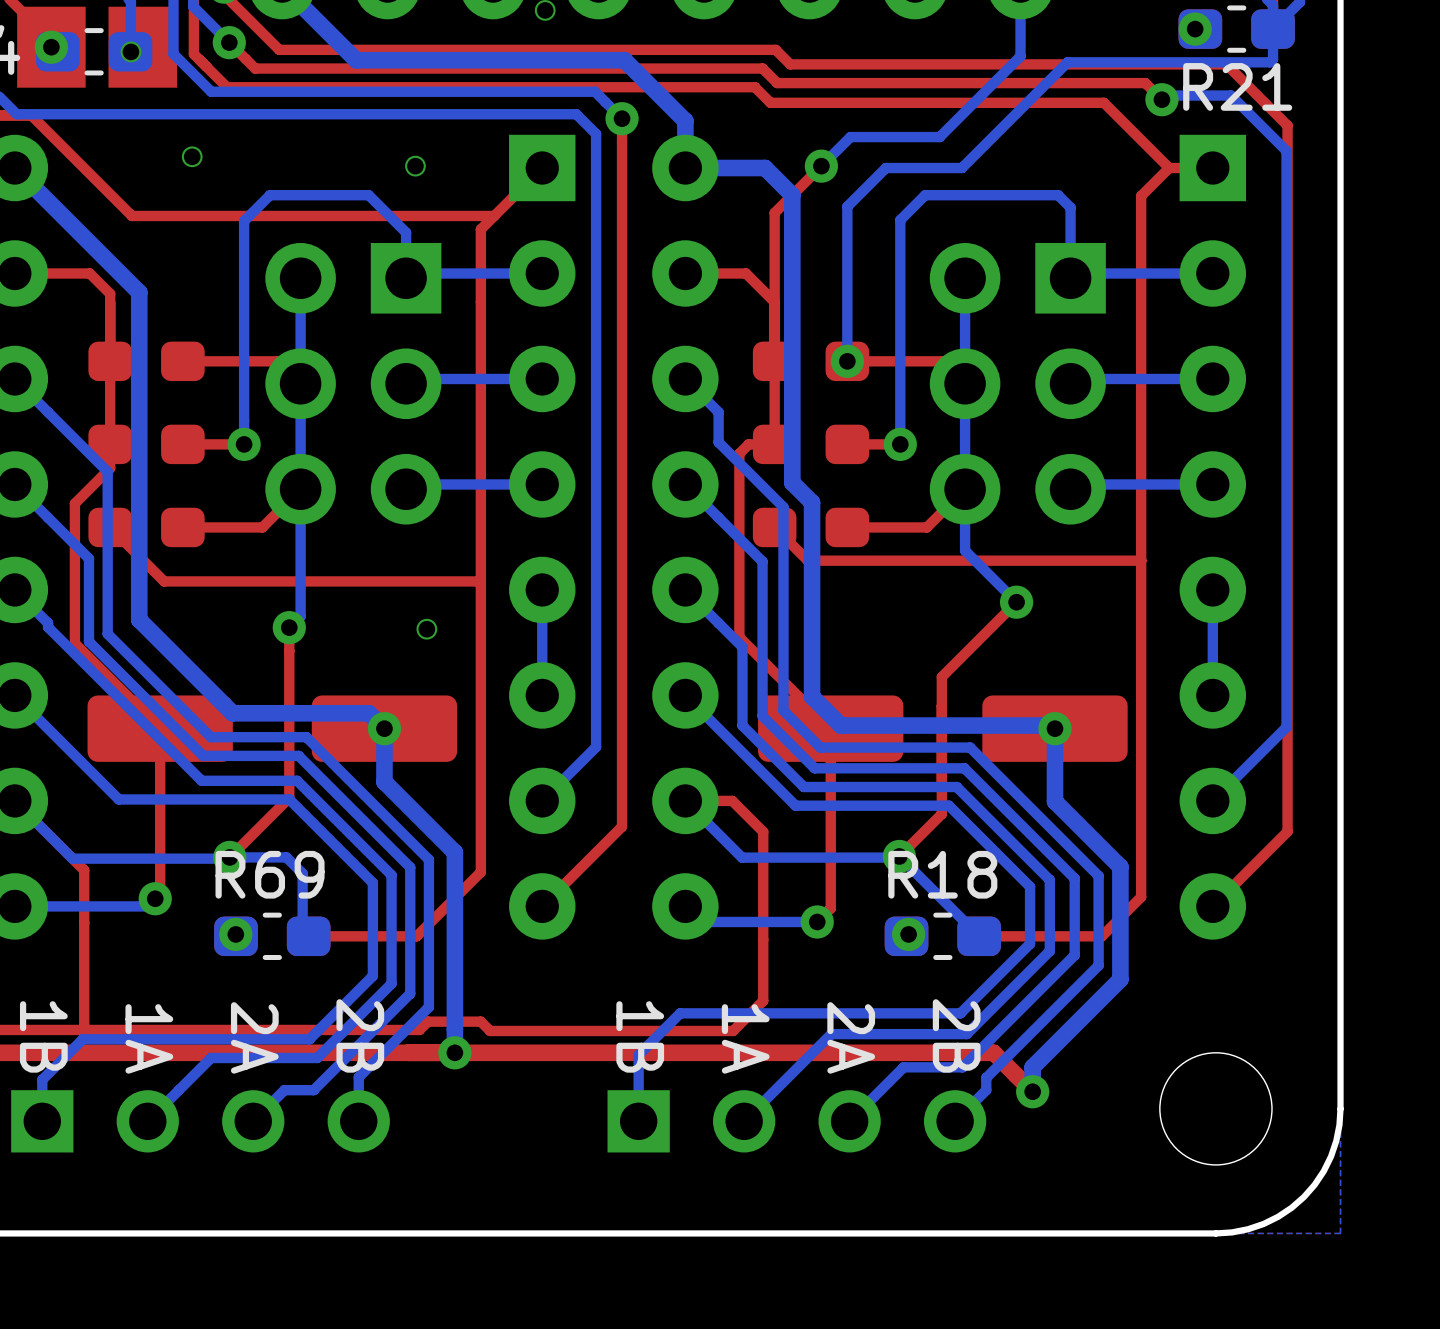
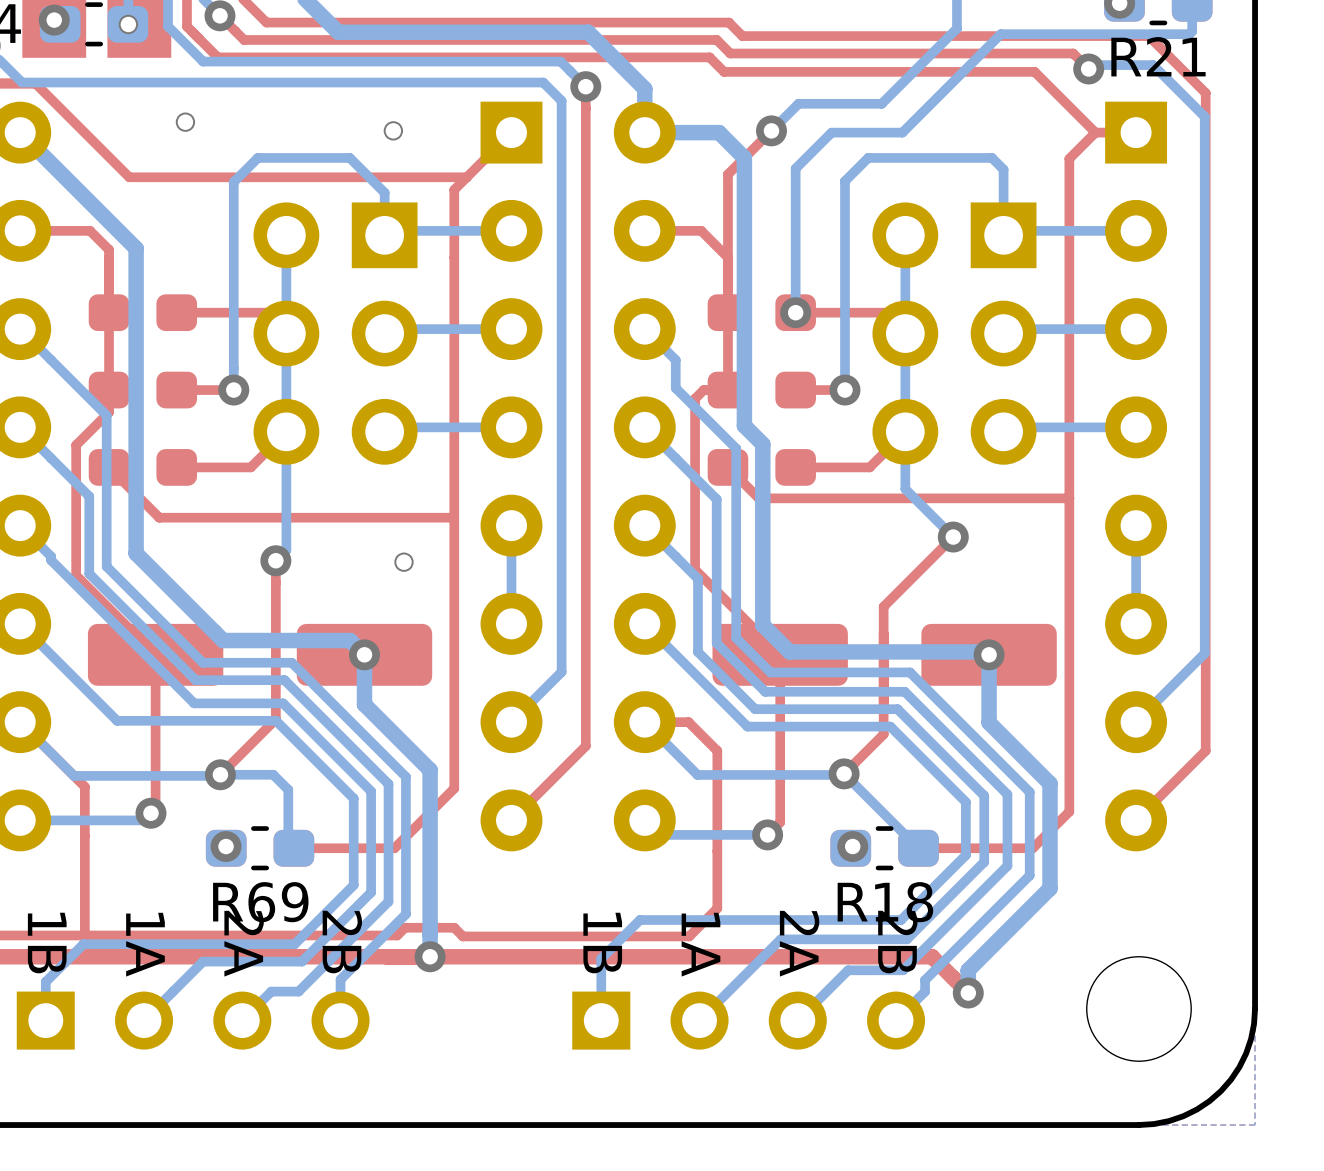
R69 name position: R69 (270, 874) -> R69 (260, 902)
R18 name position: R18 (942, 874) -> R18 (885, 902)

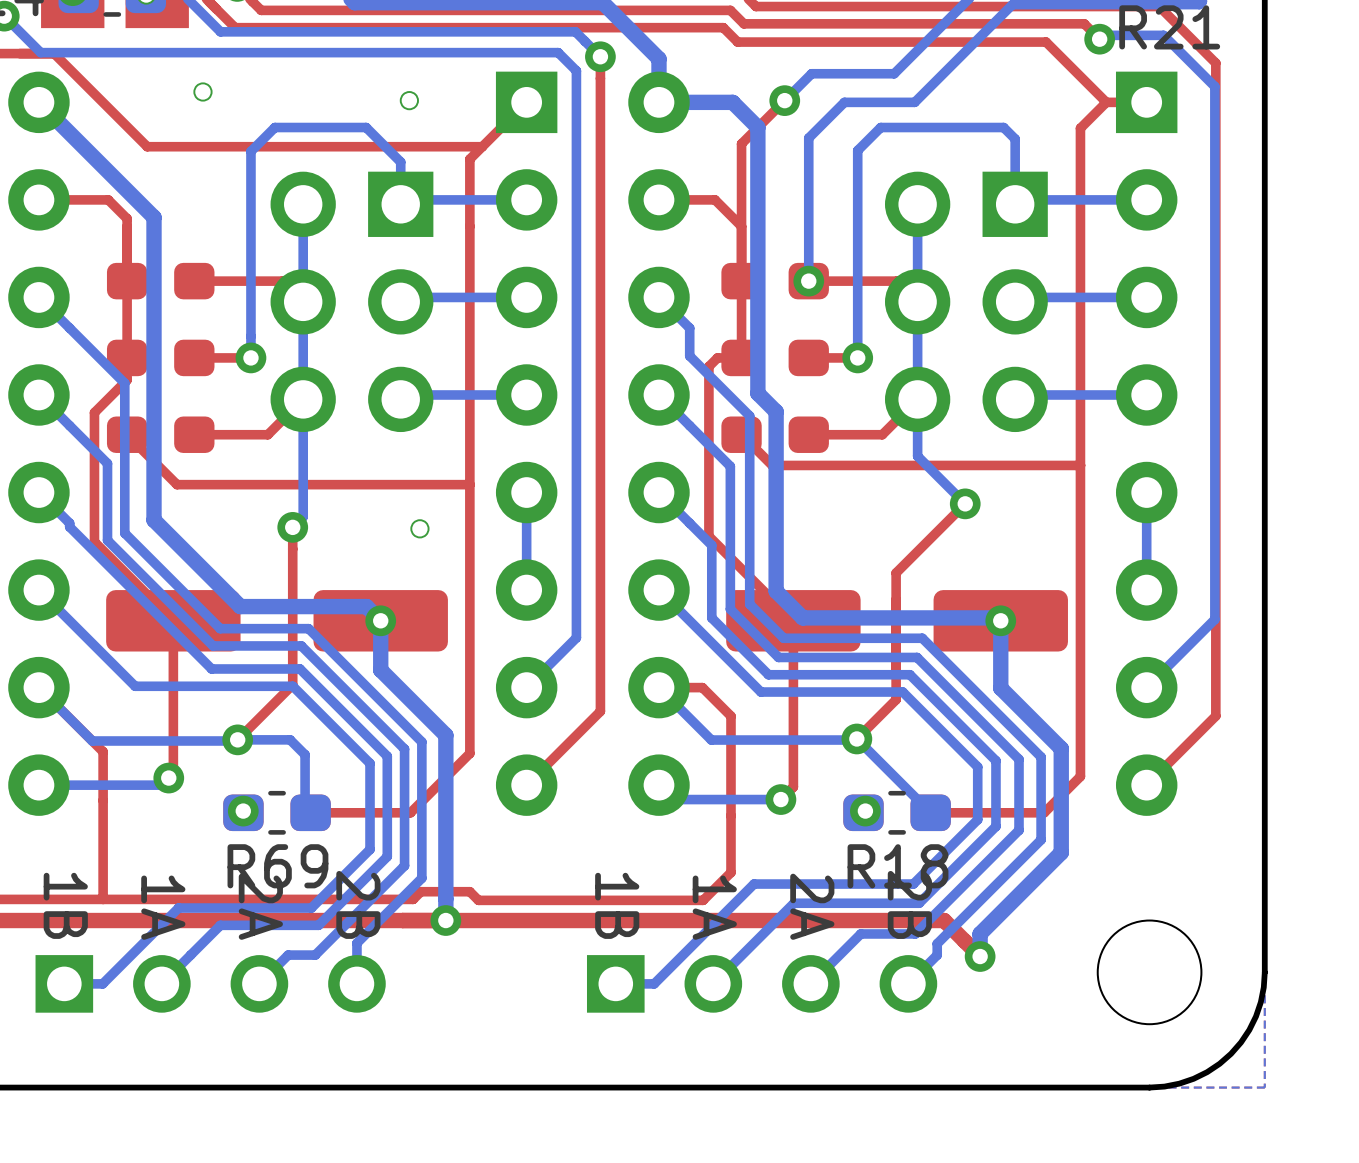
bottom track: (740, 920) (639, 920) (601, 958) (601, 1020) -> (754, 884) (654, 983) (615, 983)
bottom track: (160, 944) (83, 944) (45, 981) (45, 1020) -> (178, 908) (102, 983) (64, 983)

